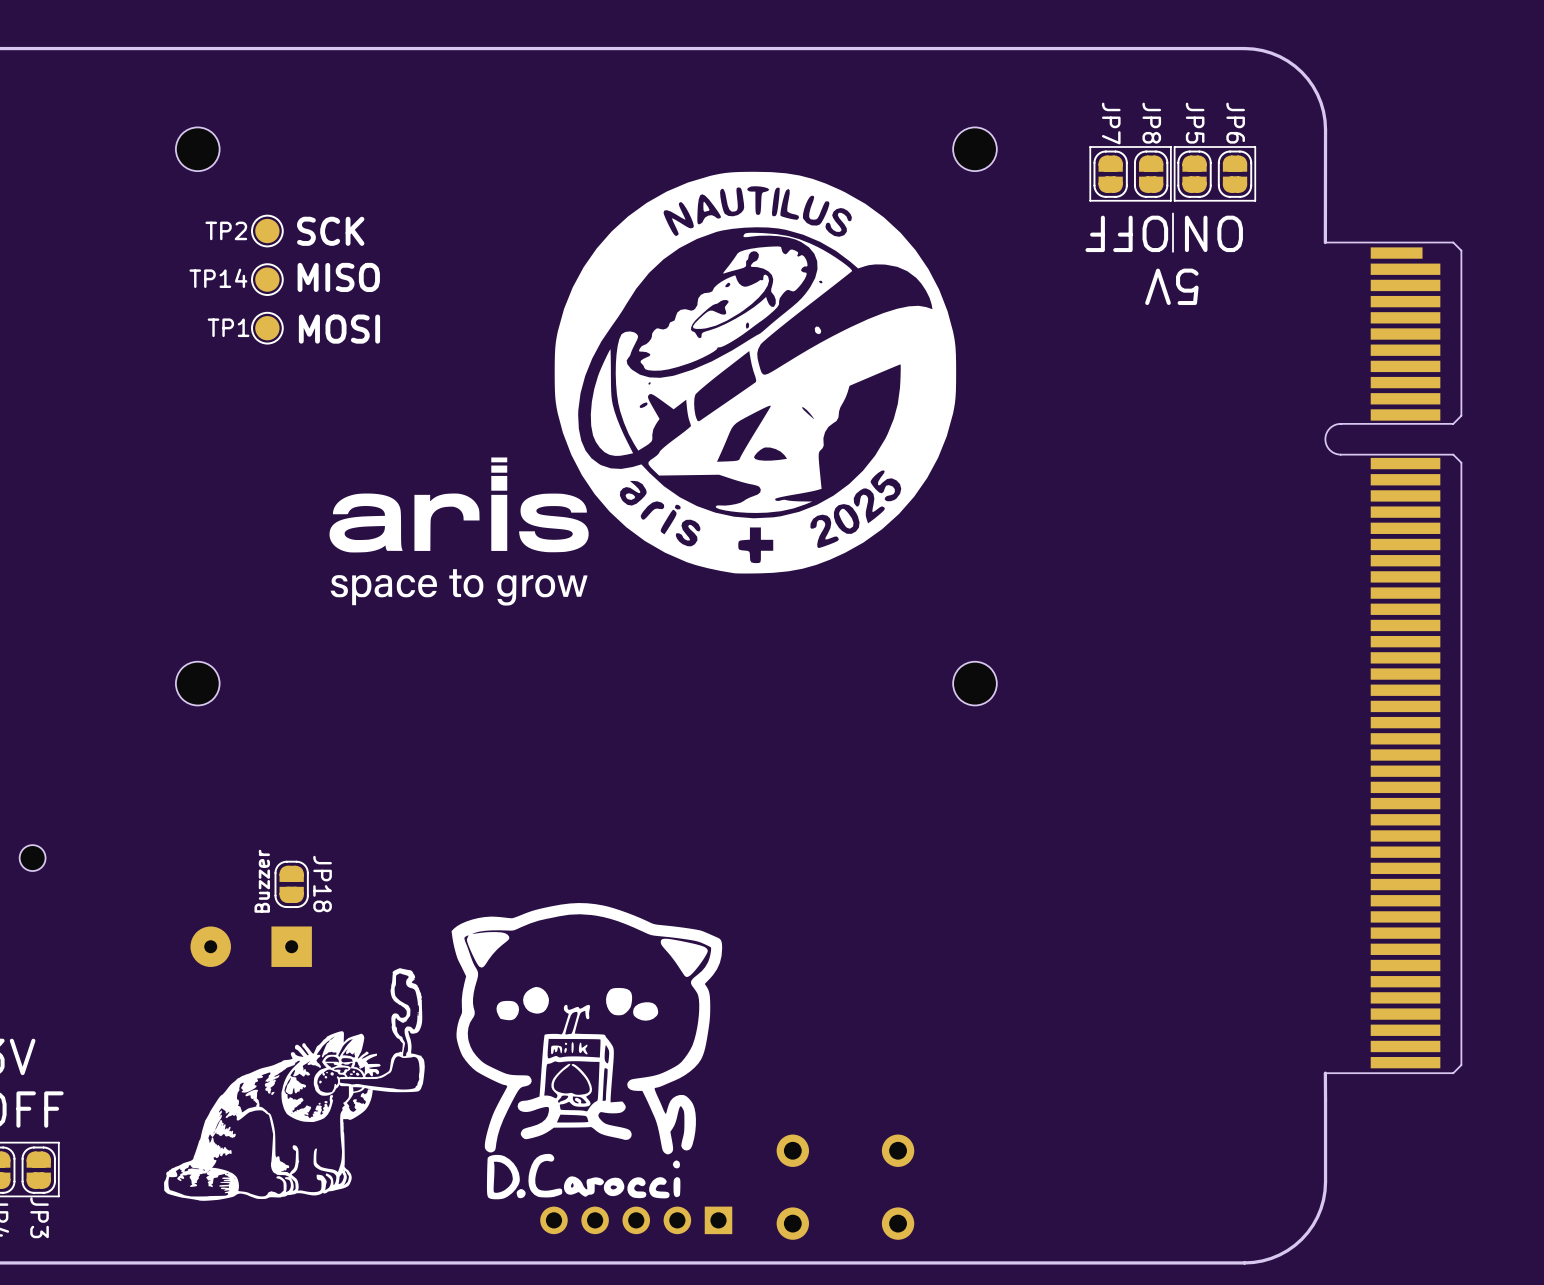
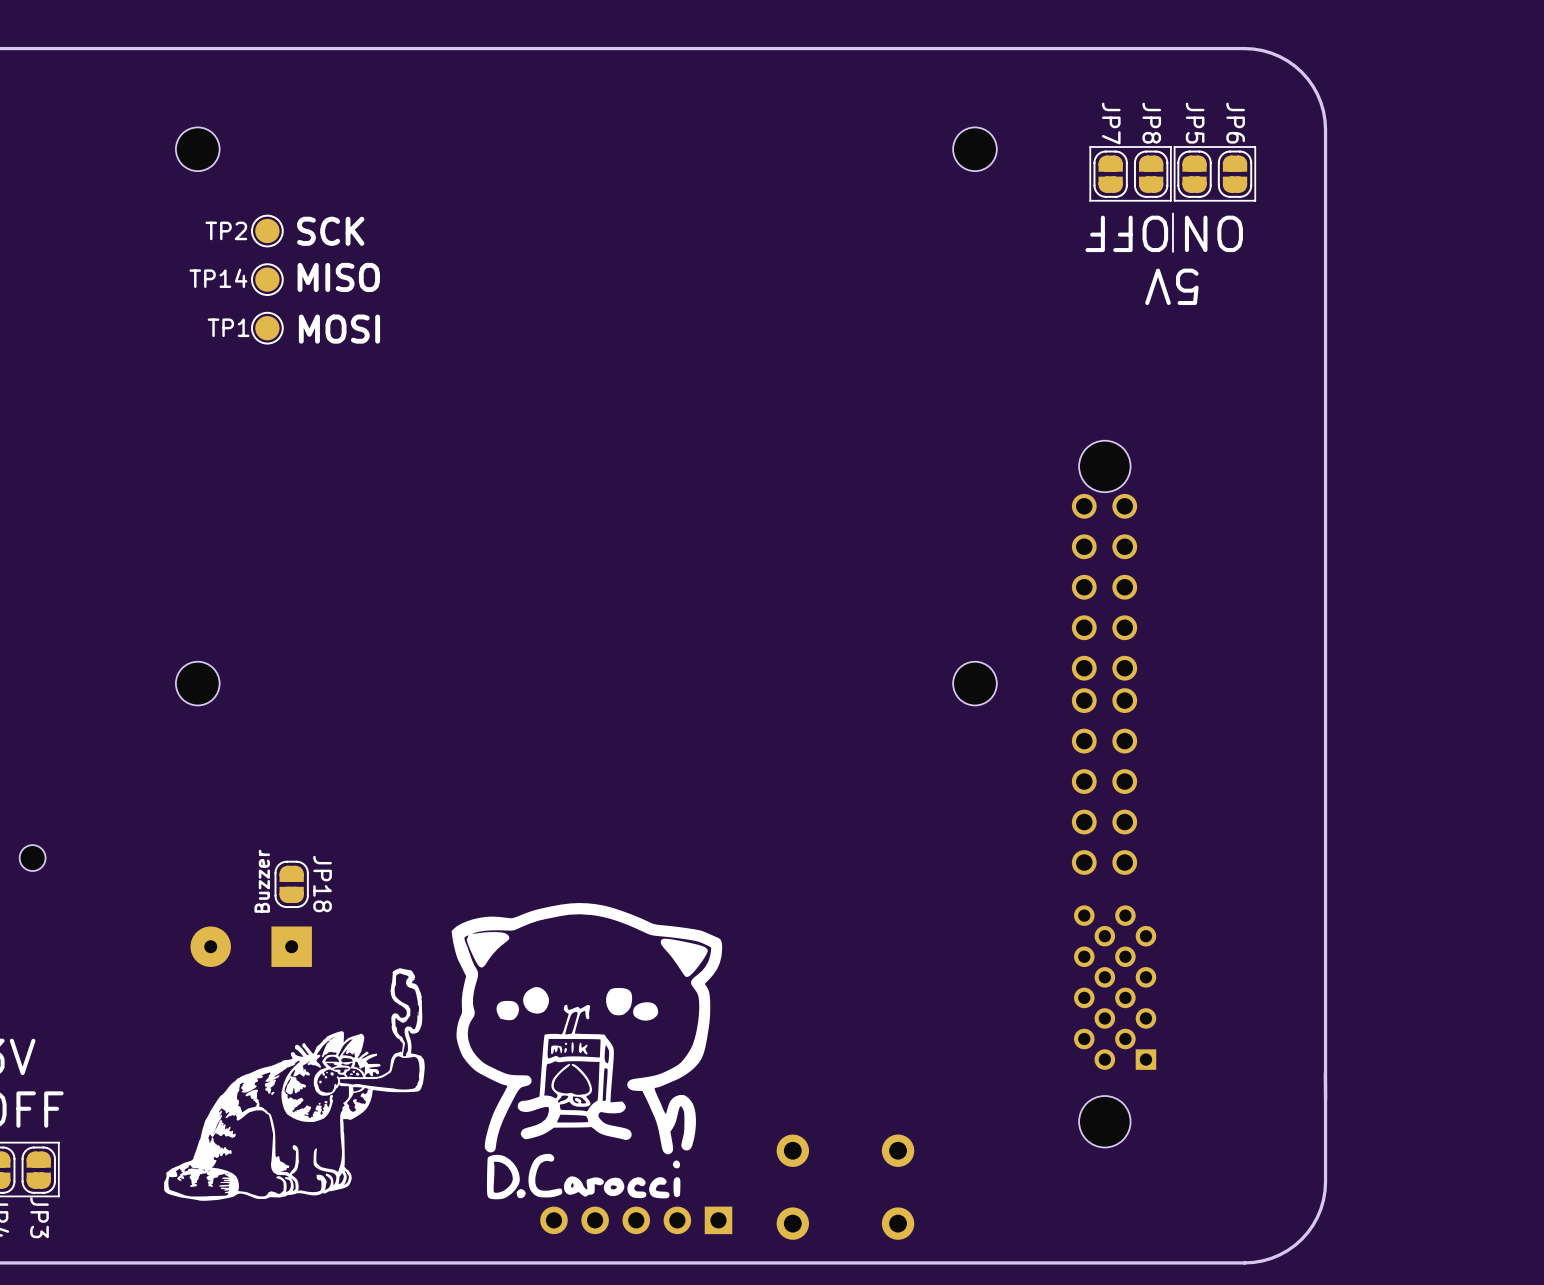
board edge: (1325, 129) (1325, 242) -> (1325, 129) (1325, 1099)
drawing: [329, 171, 957, 606] -> none
part: (1393, 657) -> none
part: none -> (1114, 794)

